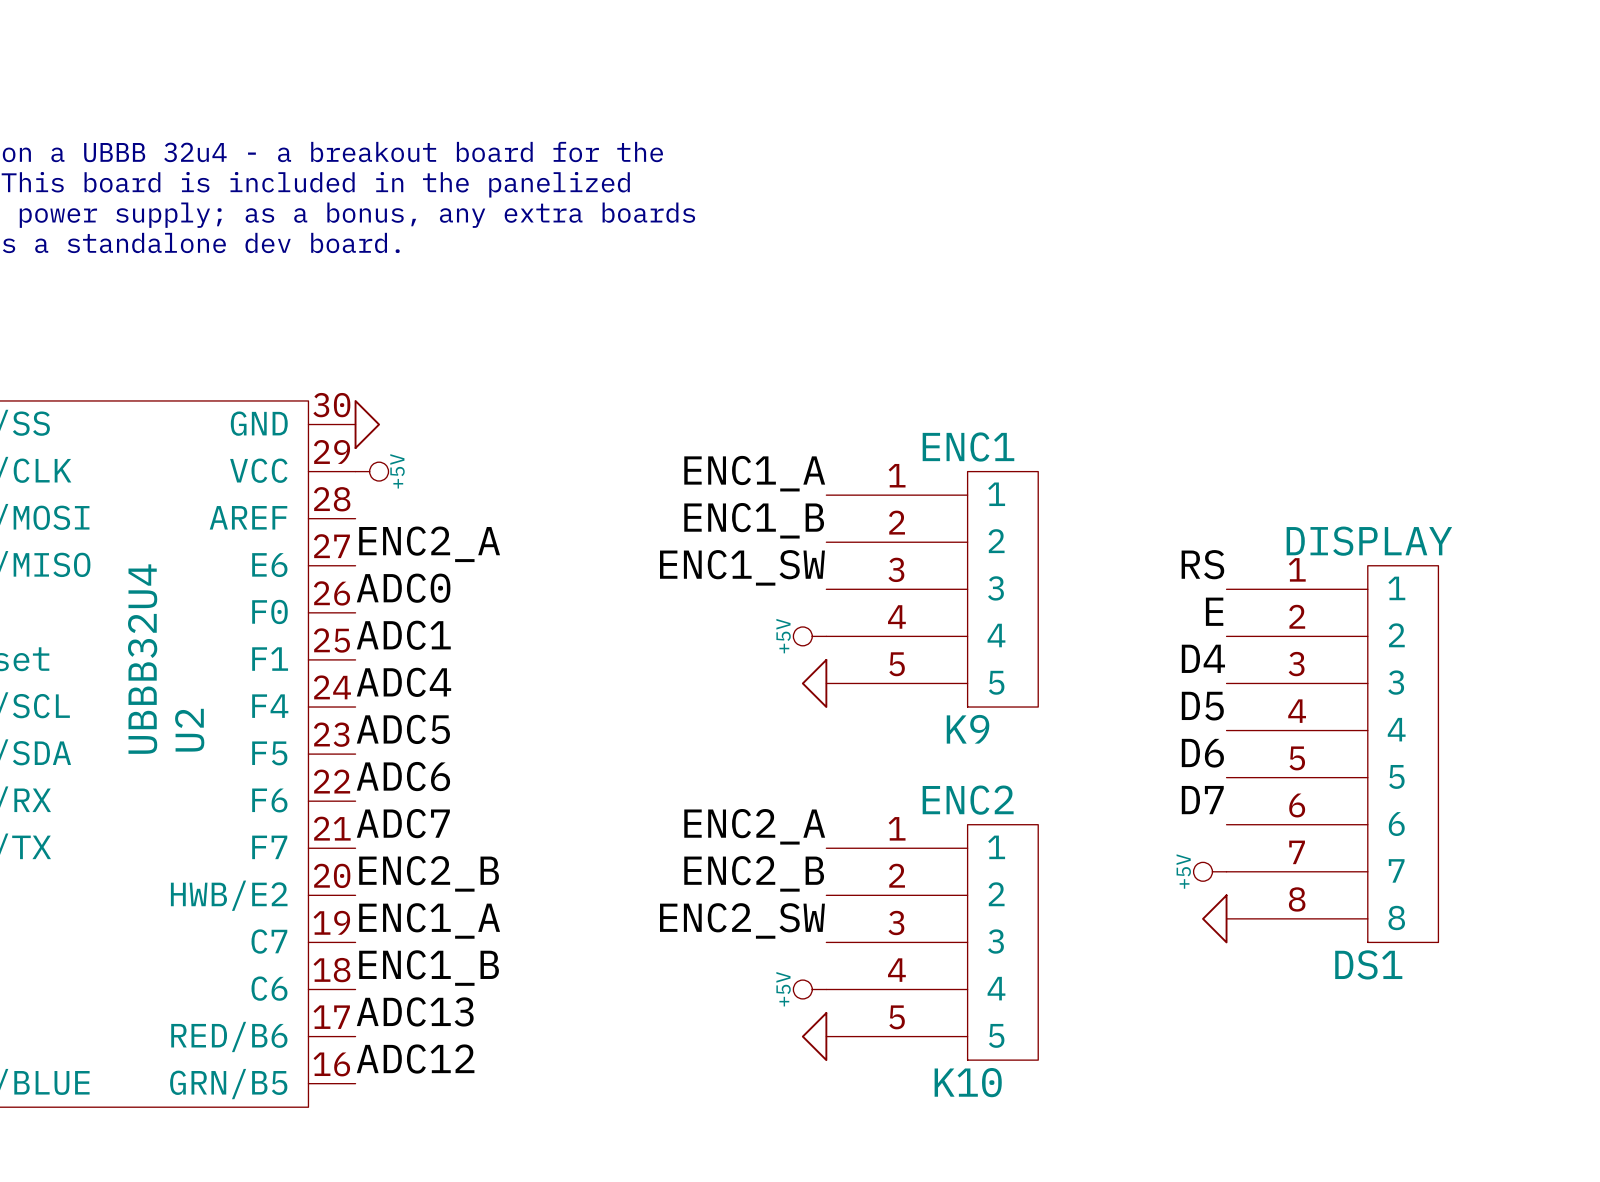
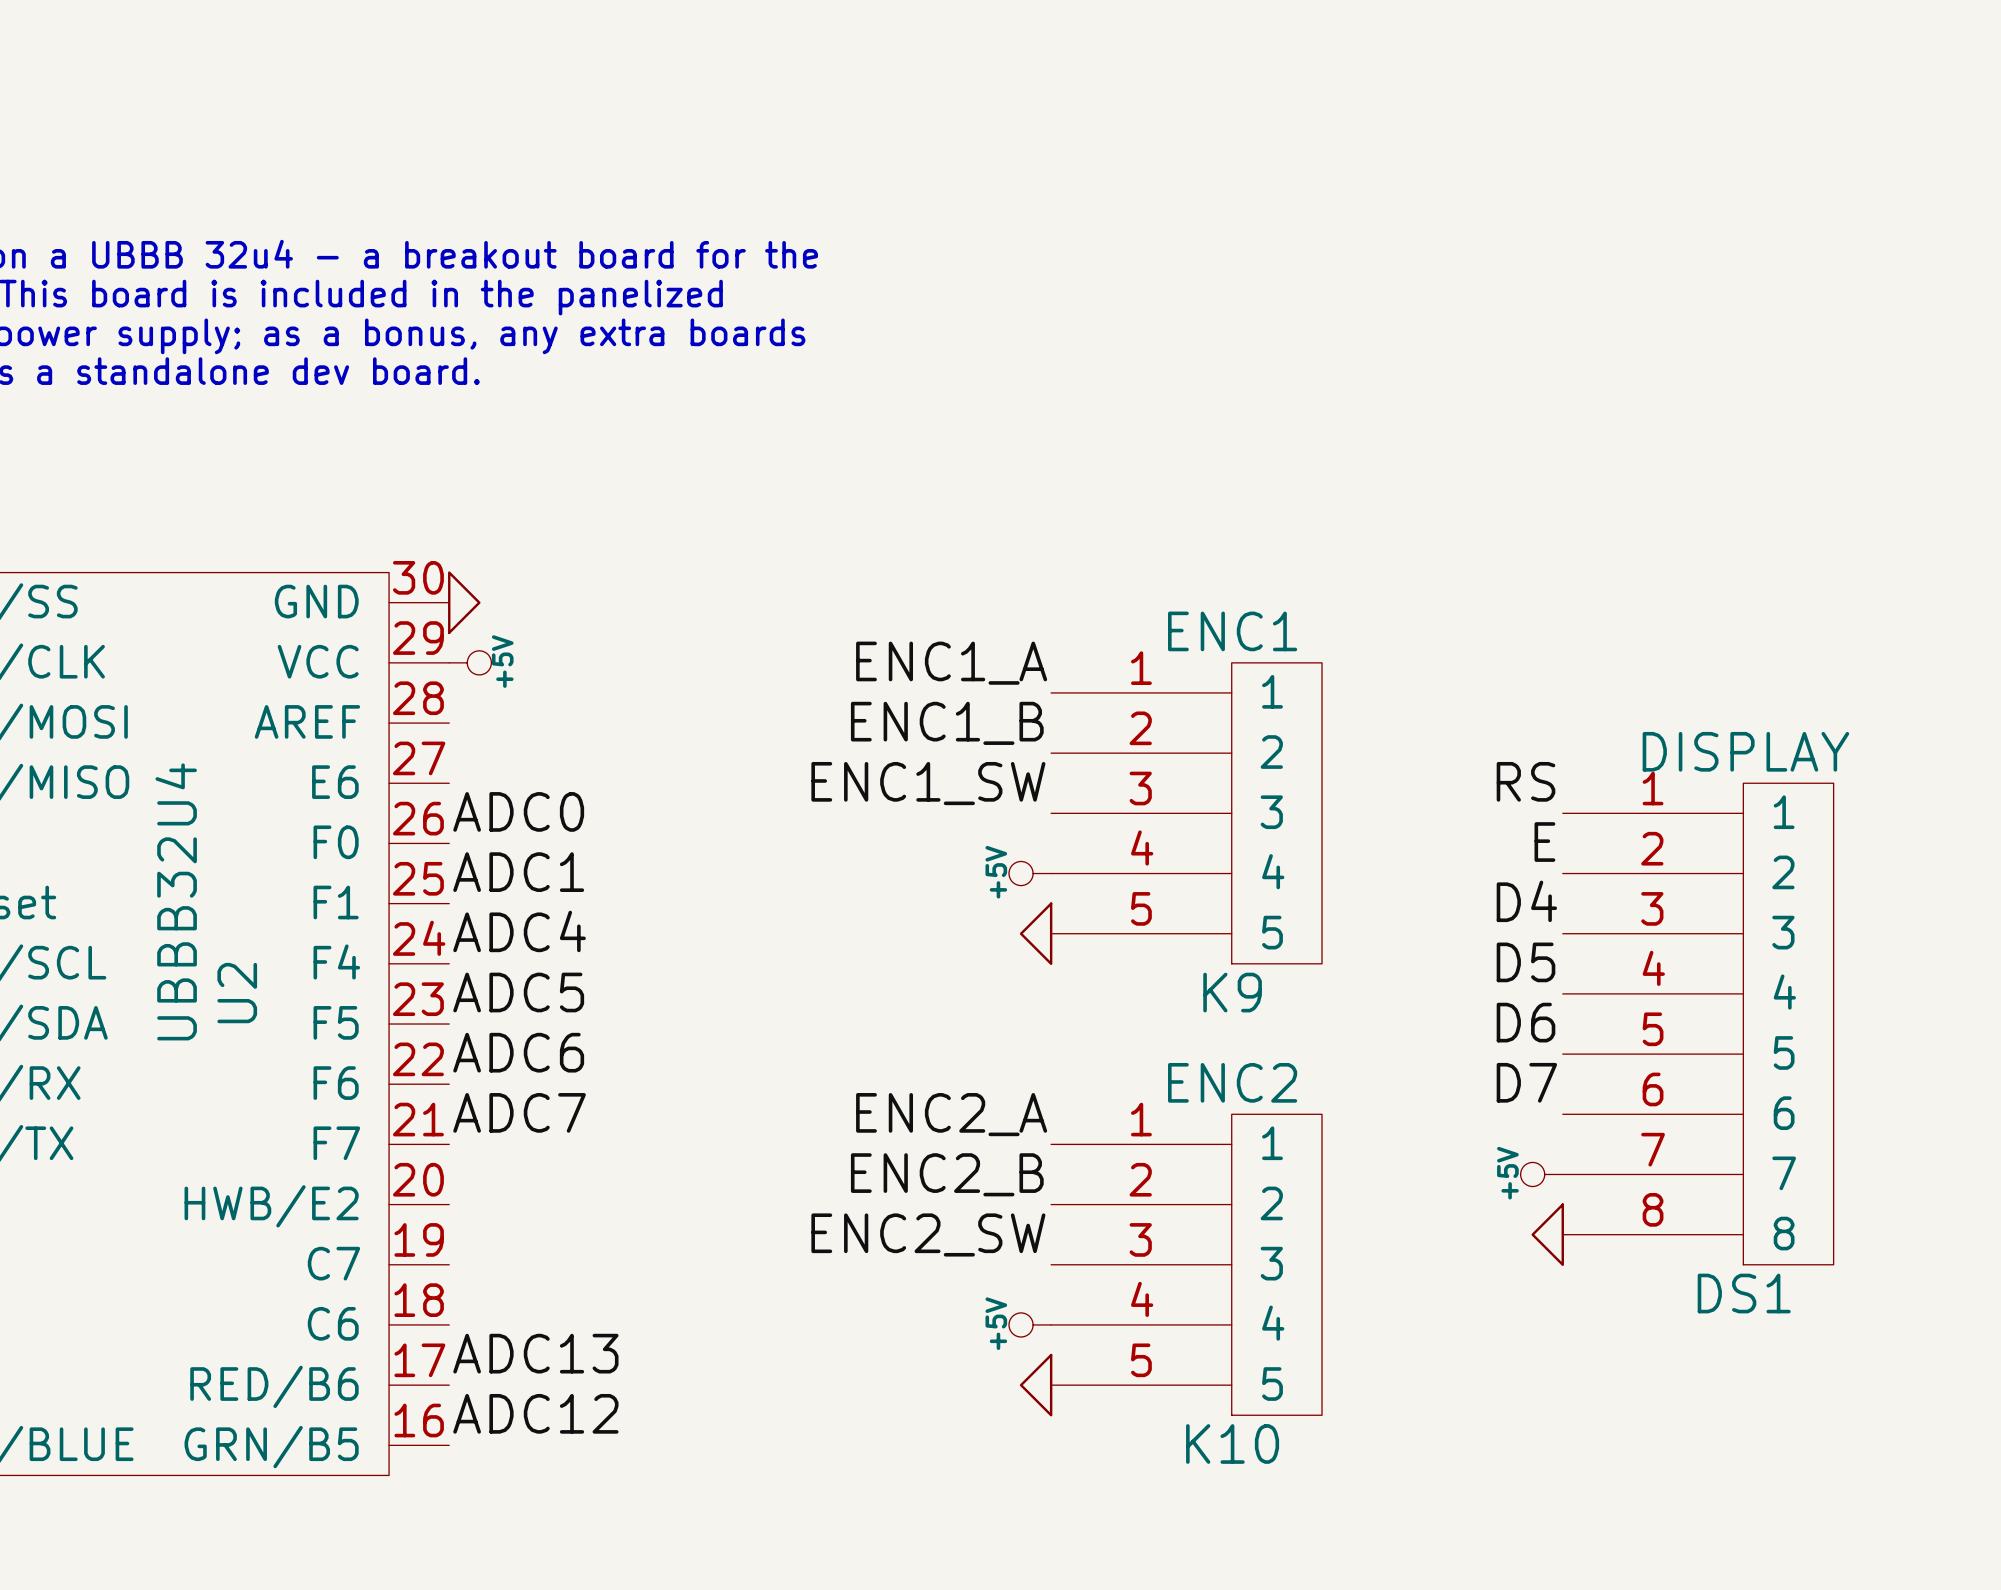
label: ENC2_A (429, 544) -> none
label: ENC2_B (429, 873) -> none
label: ENC1_A (429, 920) -> none
label: ENC1_B (429, 968) -> none

